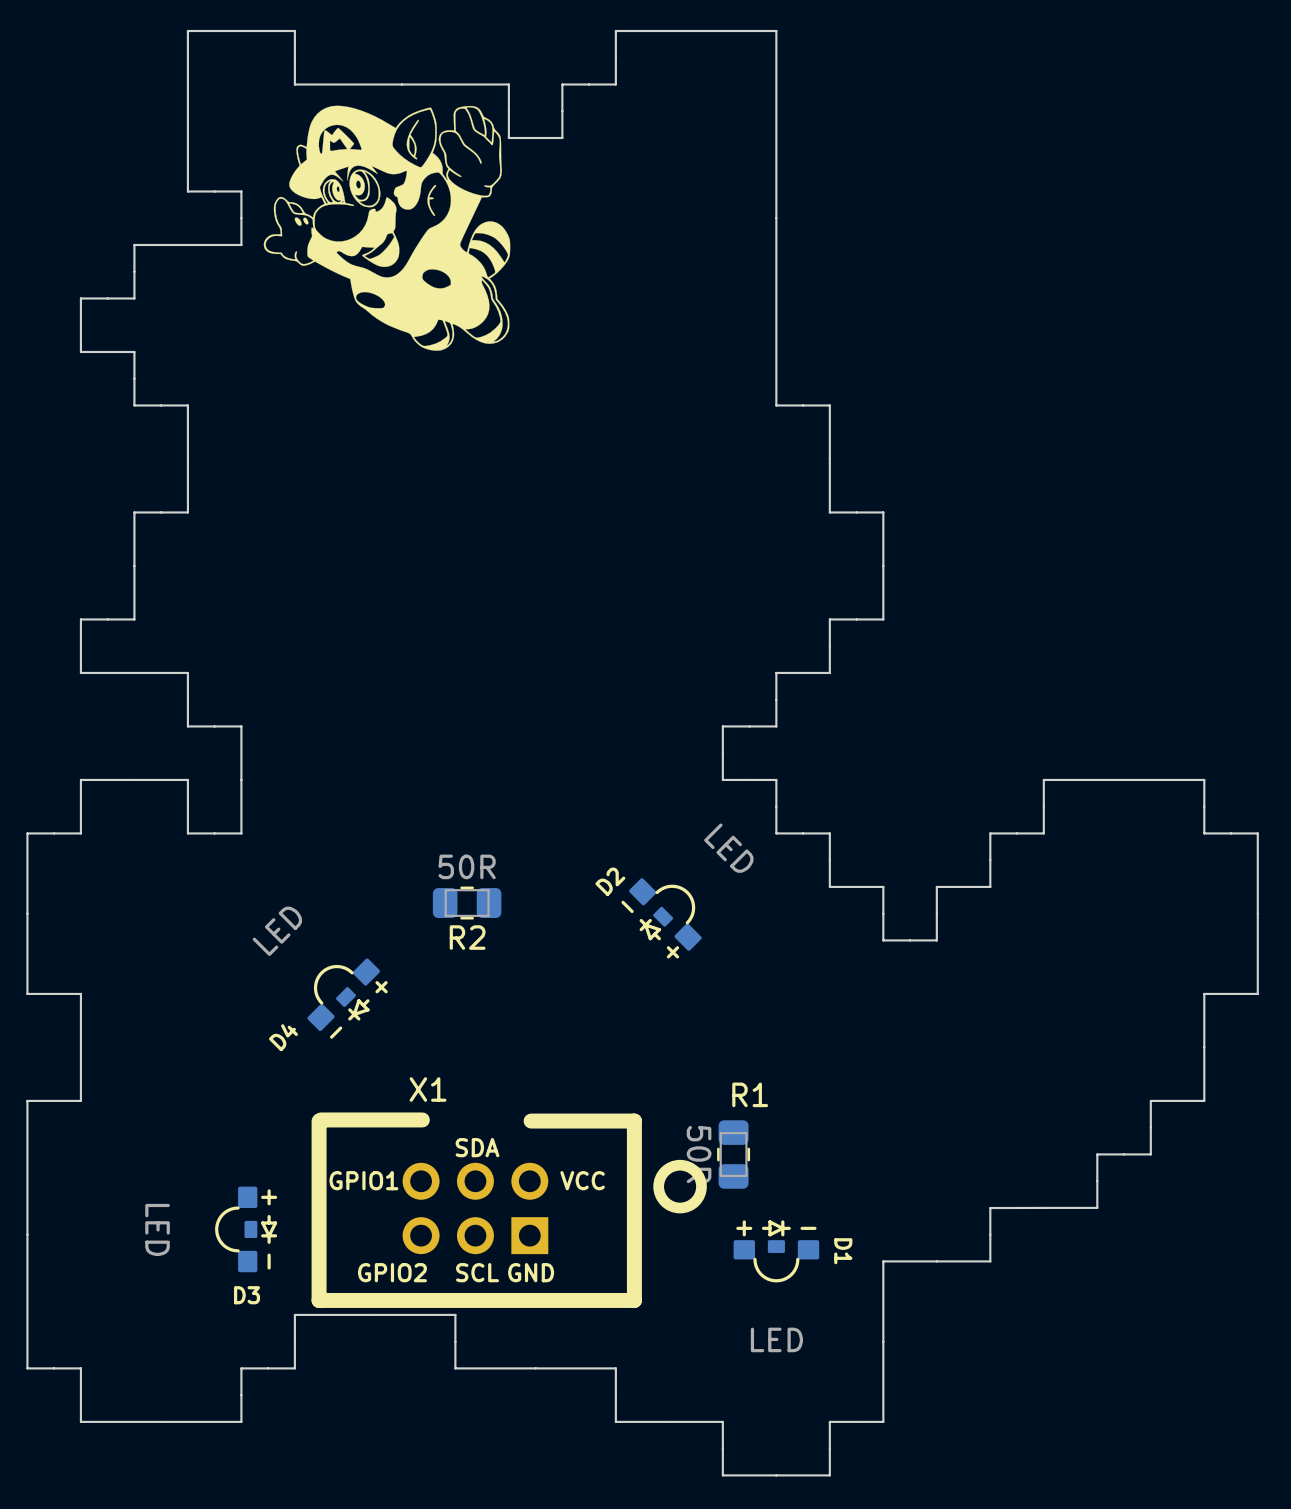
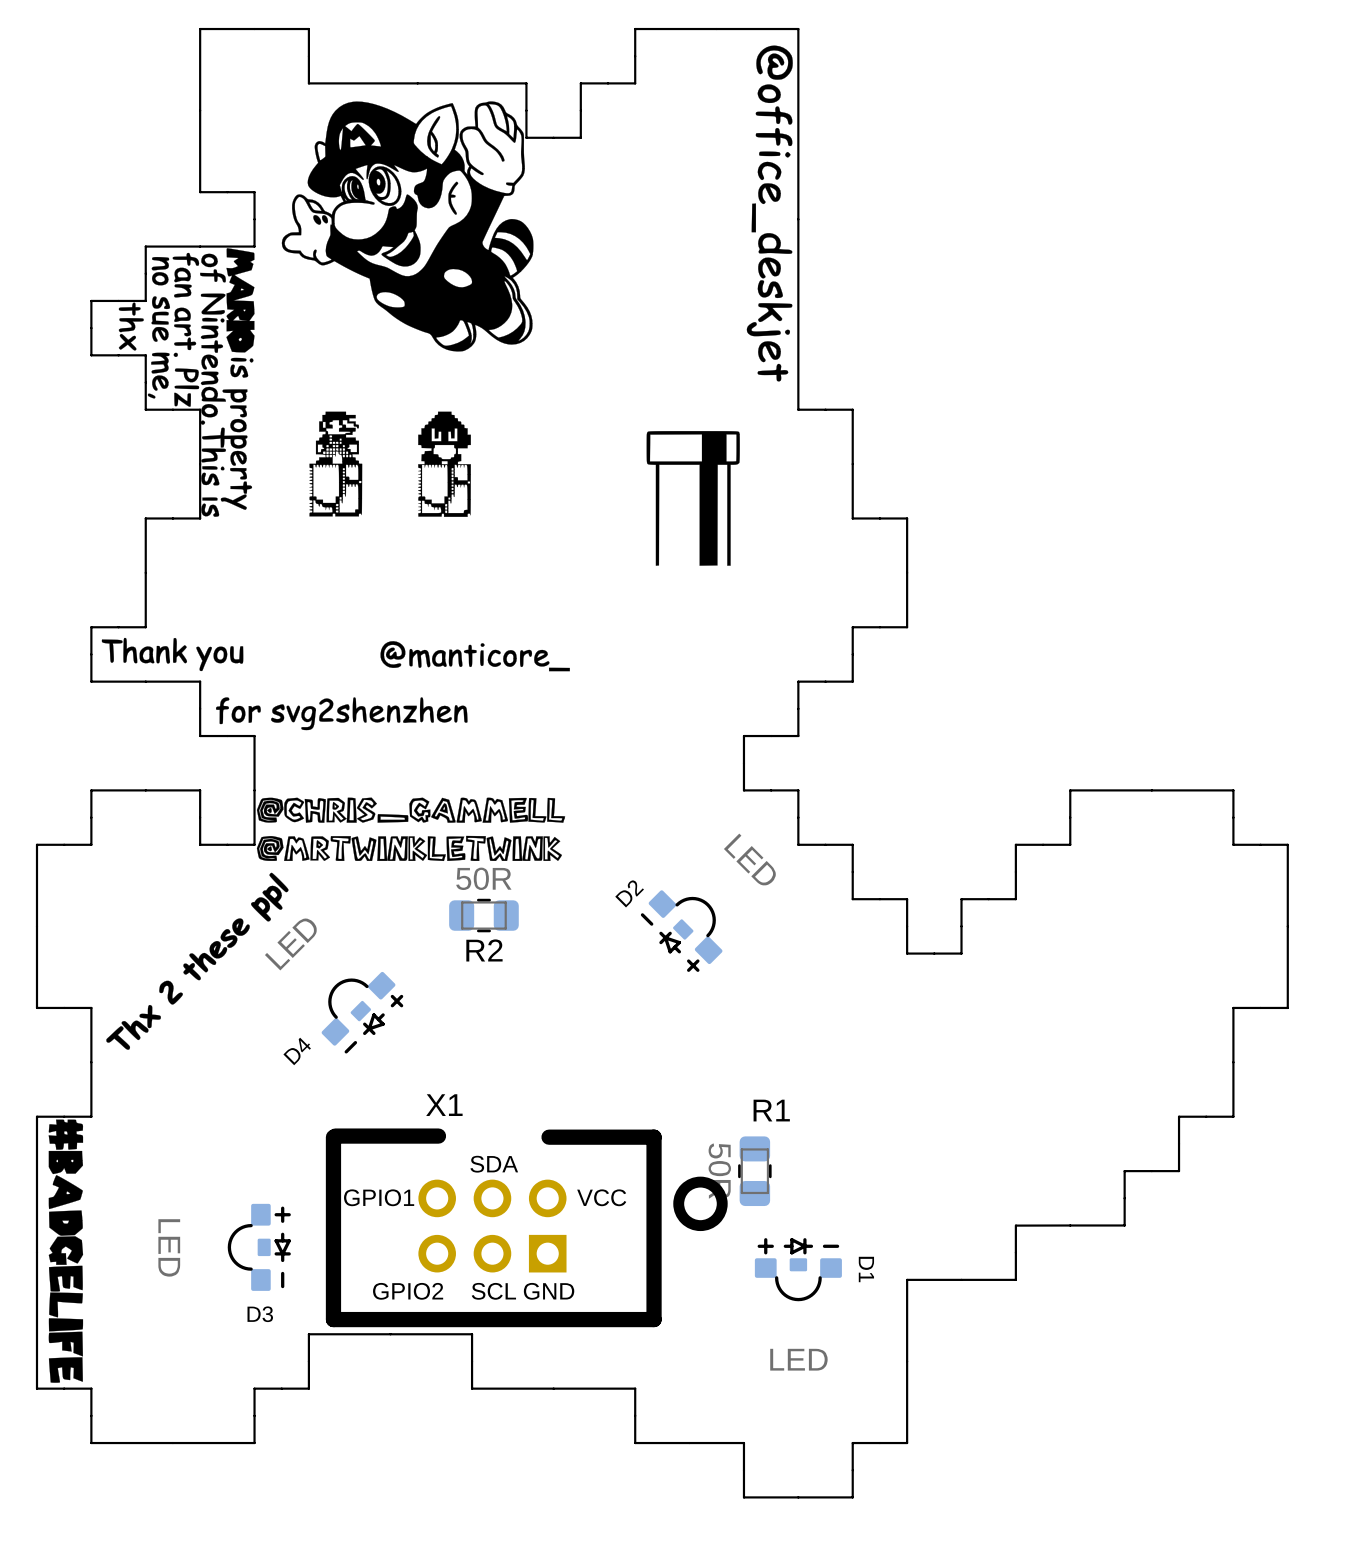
drawing: none -> [48, 45, 793, 1383]
drawing: [263, 105, 511, 351] -> none

